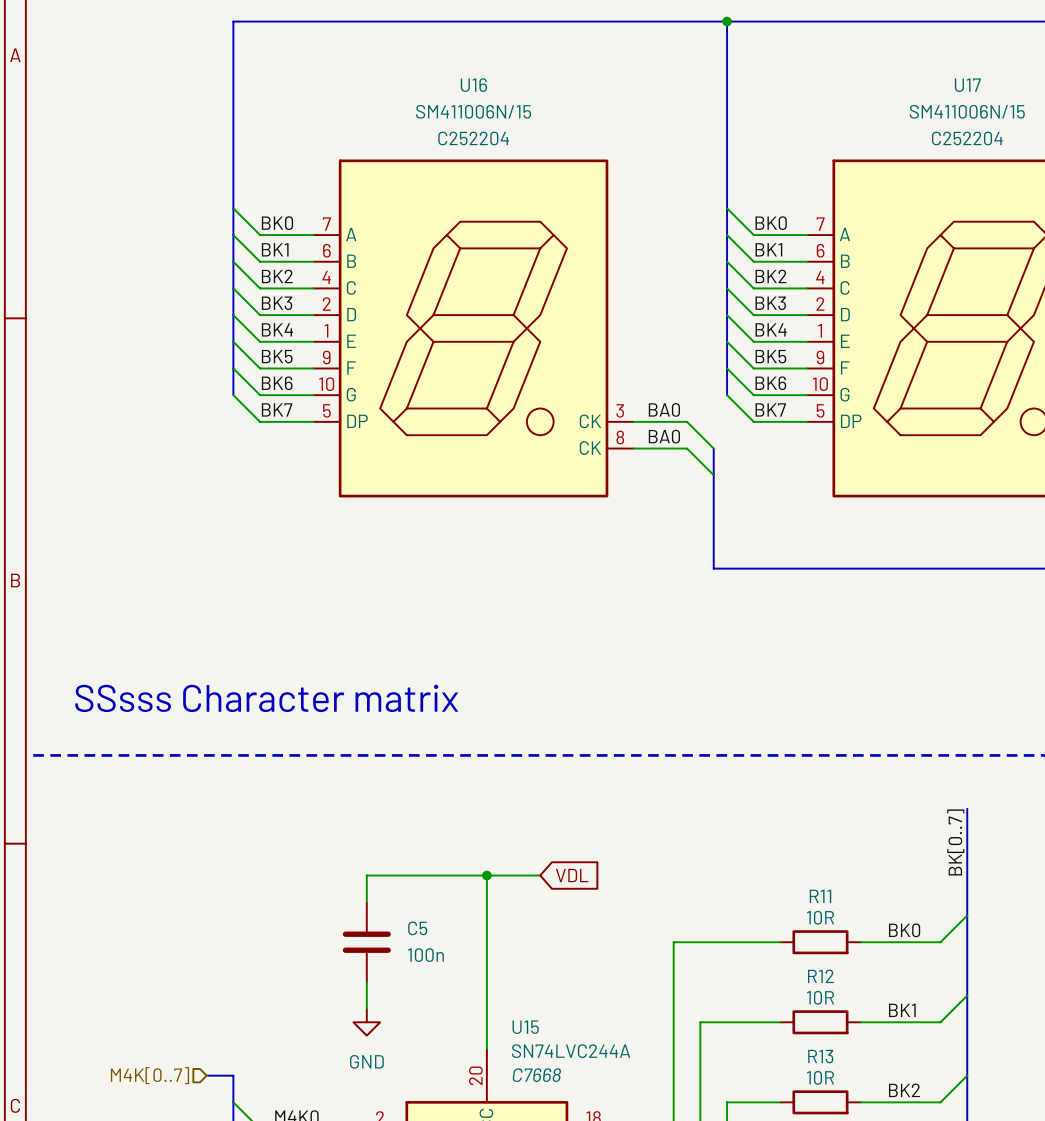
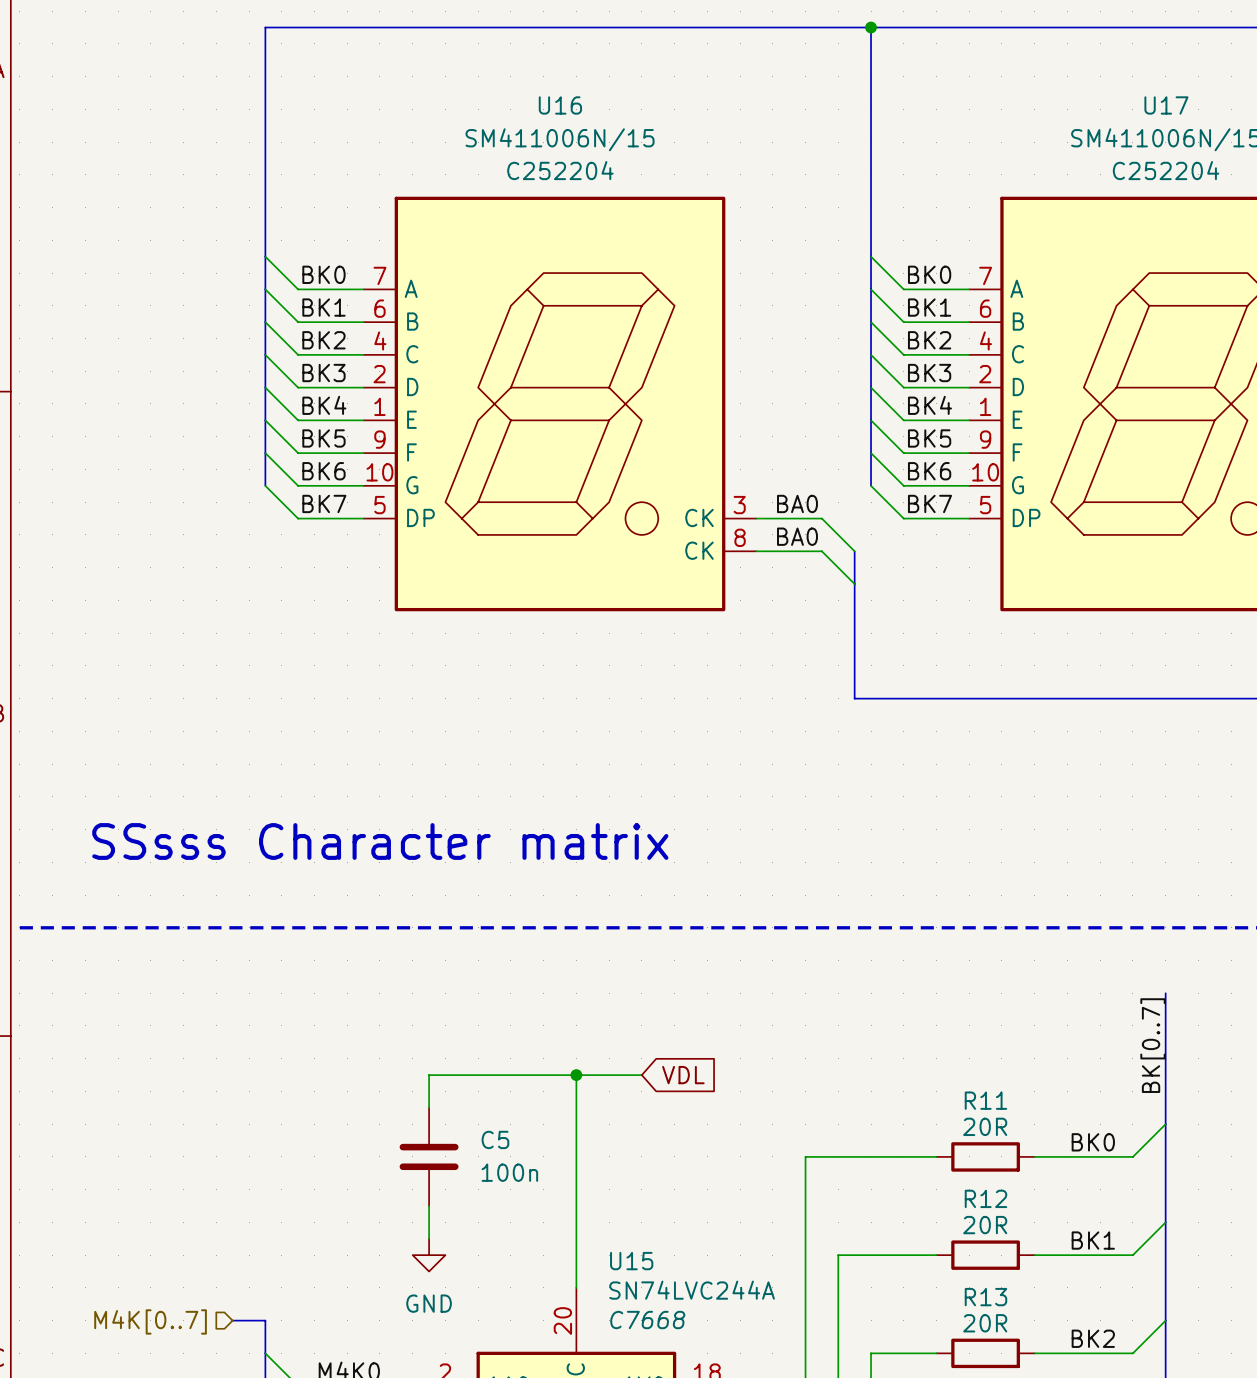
text position: SSsss Character matrix (266, 698) -> SSsss Character matrix (380, 841)
R11 value: 10R (820, 917) -> 20R (985, 1126)
R12 value: 10R (820, 997) -> 20R (985, 1225)
R13 value: 10R (820, 1077) -> 20R (985, 1323)

